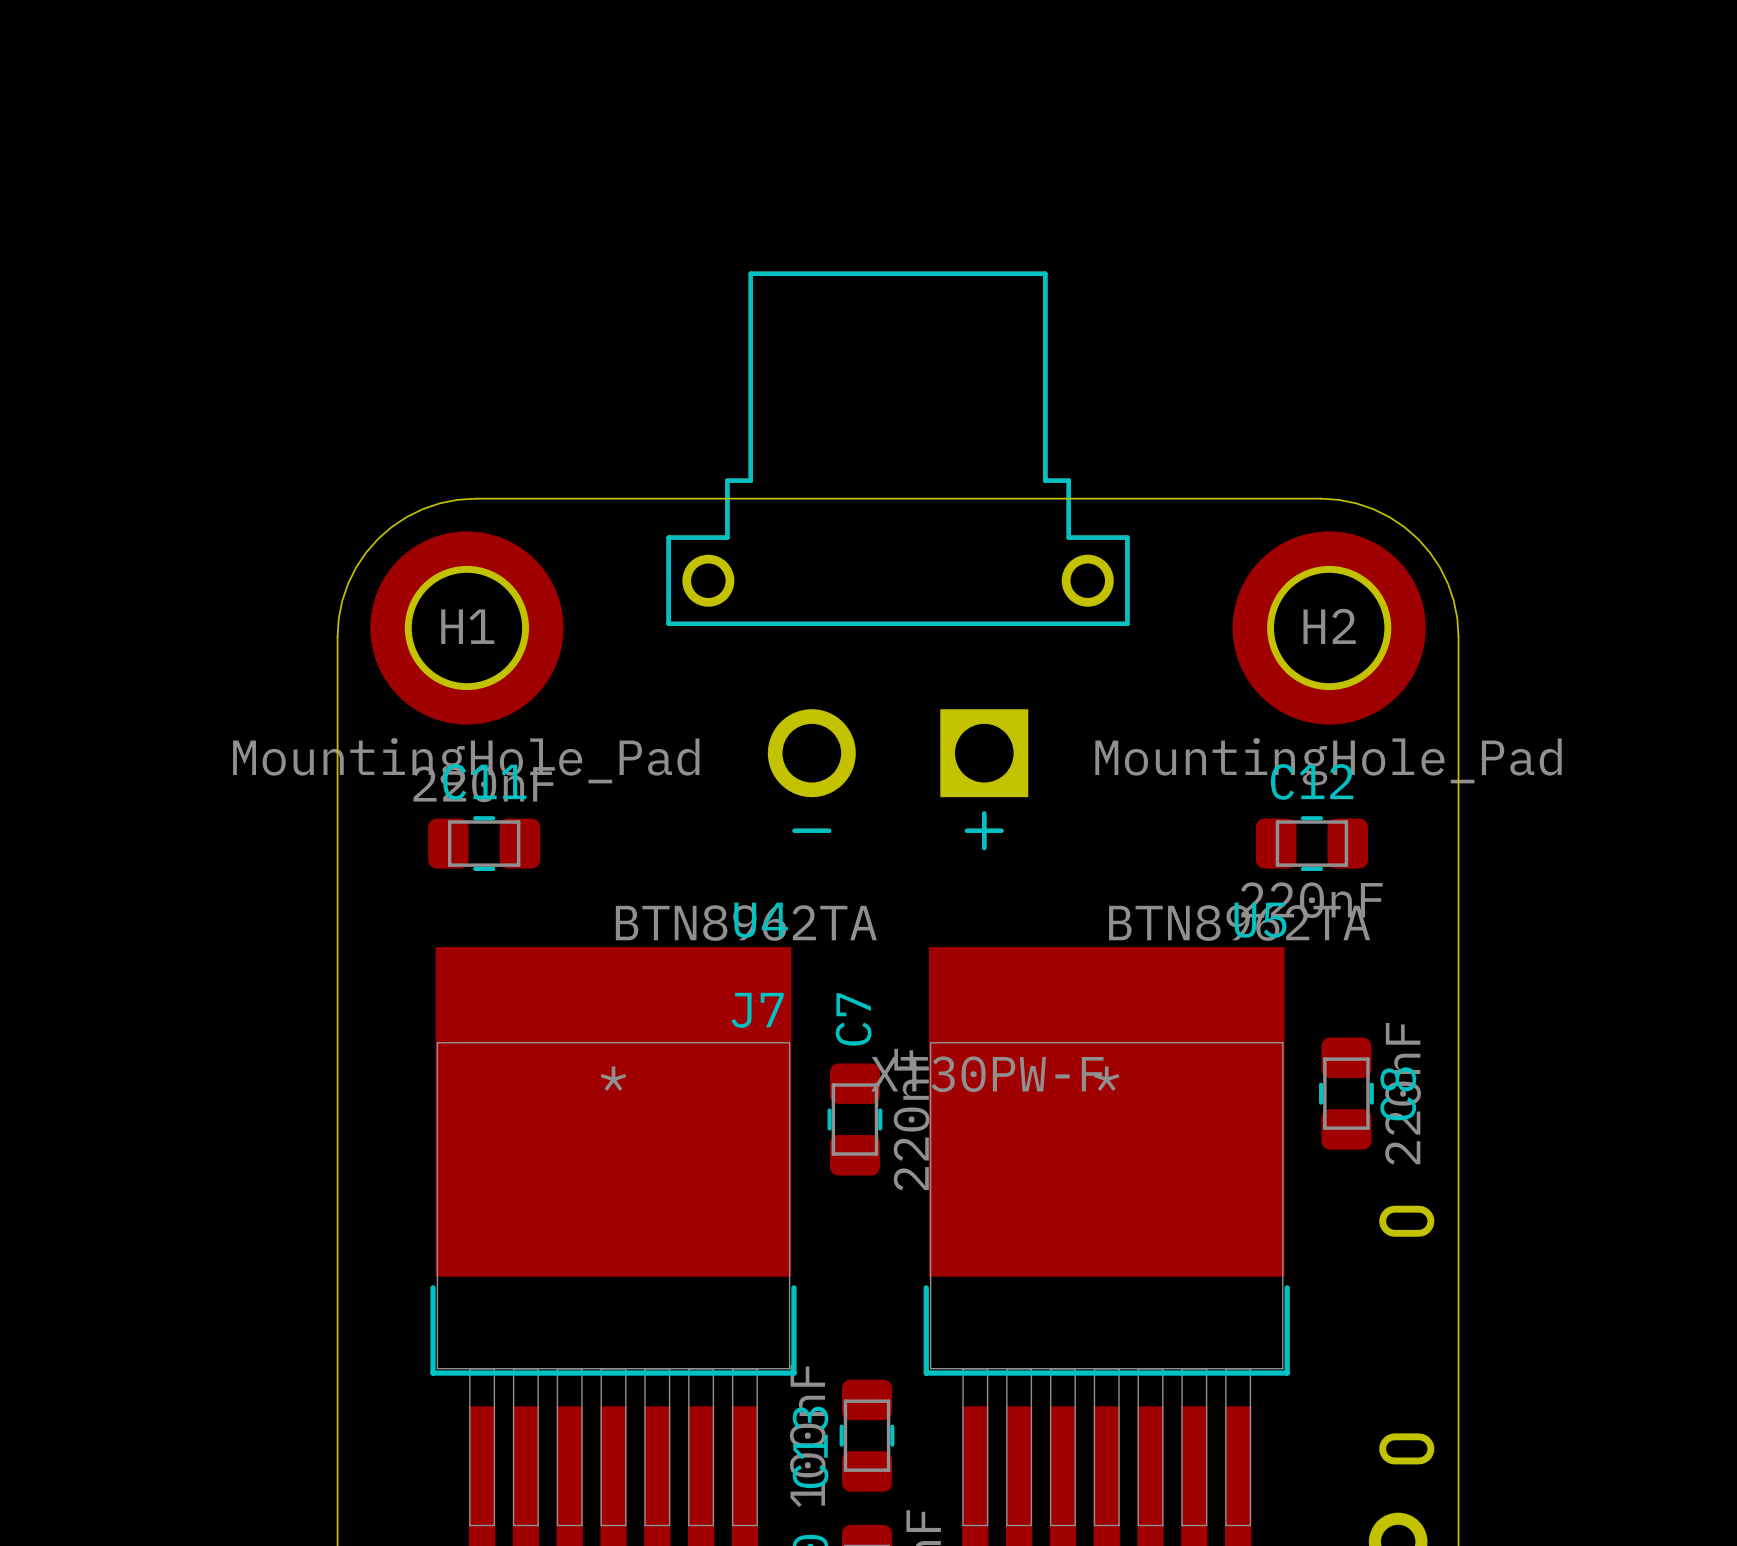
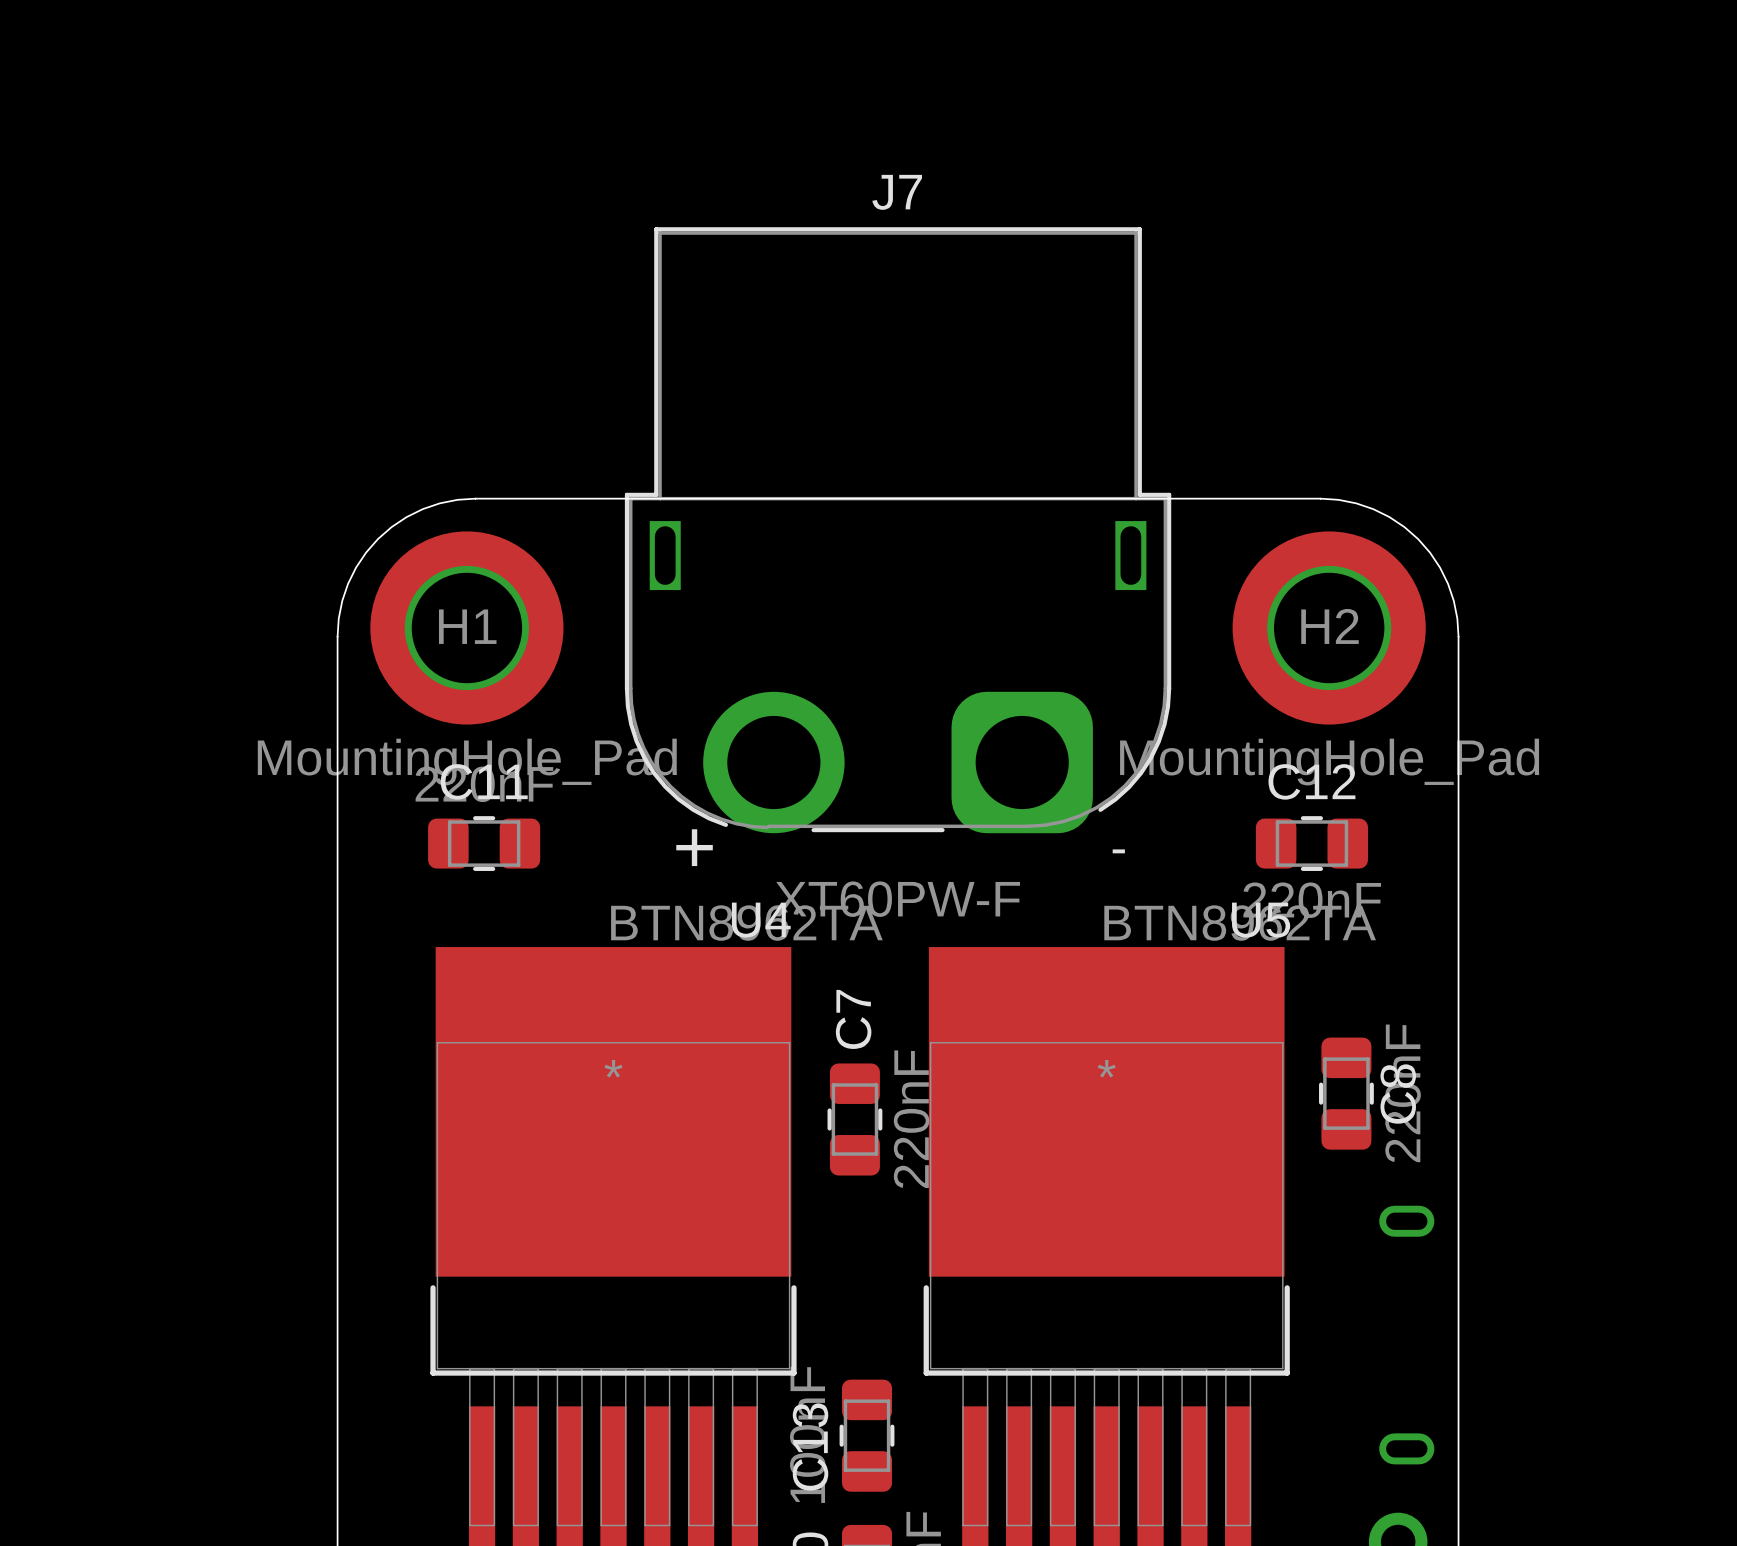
J7 footprint: [666, 271, 1130, 851] -> [624, 227, 1172, 834]
J7 name position: J7 (757, 1010) -> J7 (897, 192)
J7 value: XT30PW-F (987, 1074) -> XT60PW-F (897, 899)

